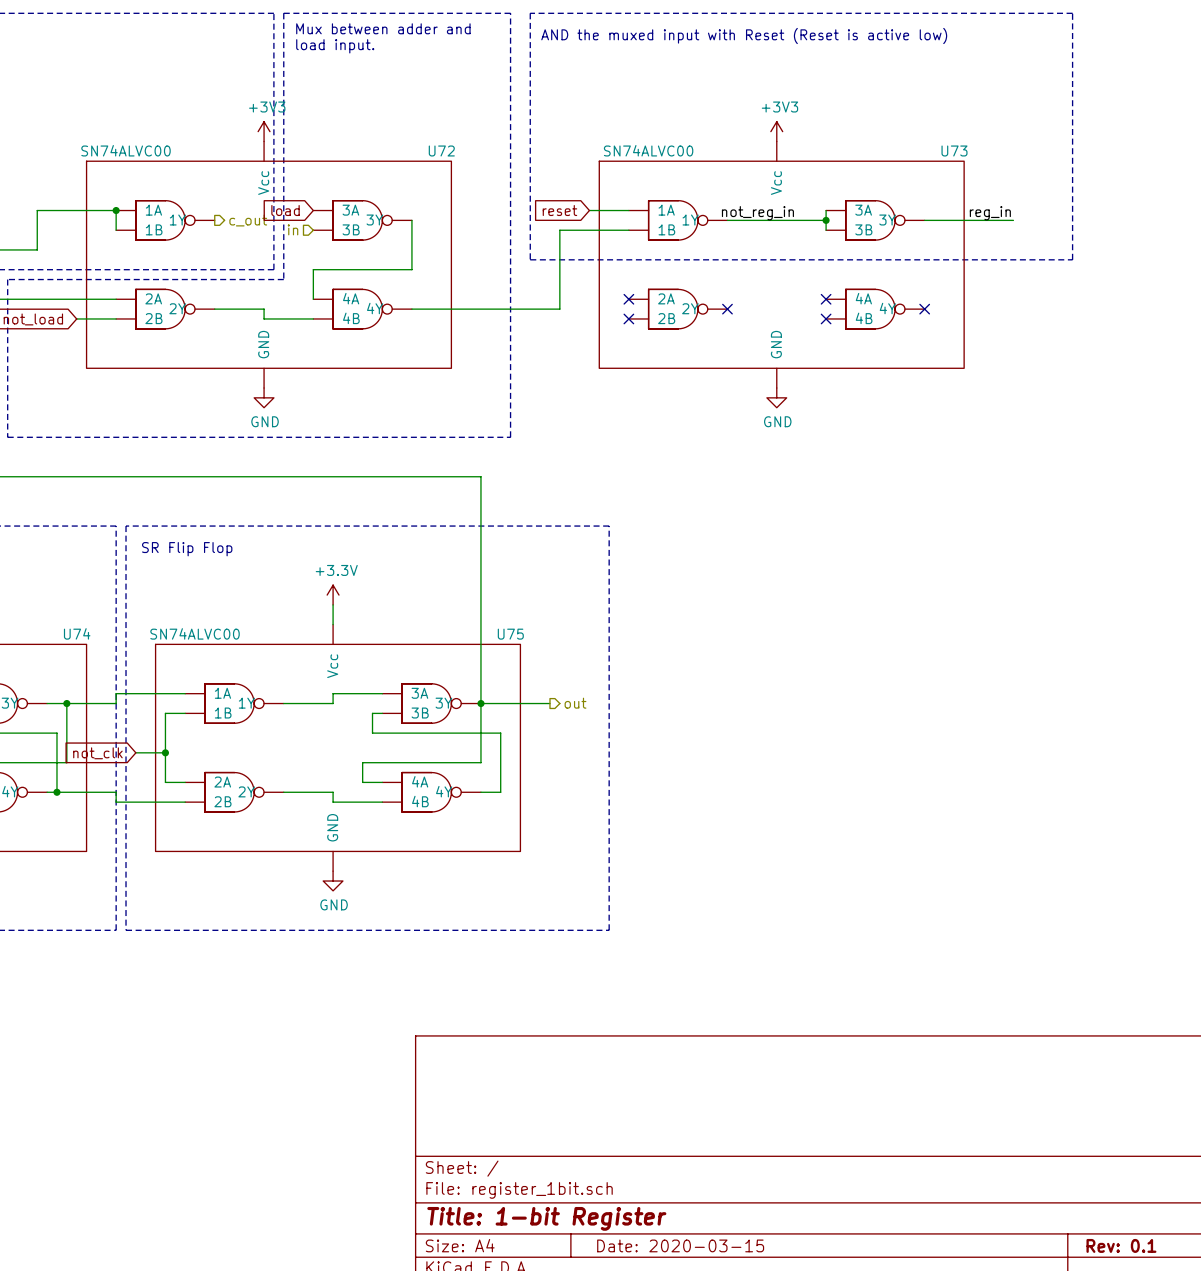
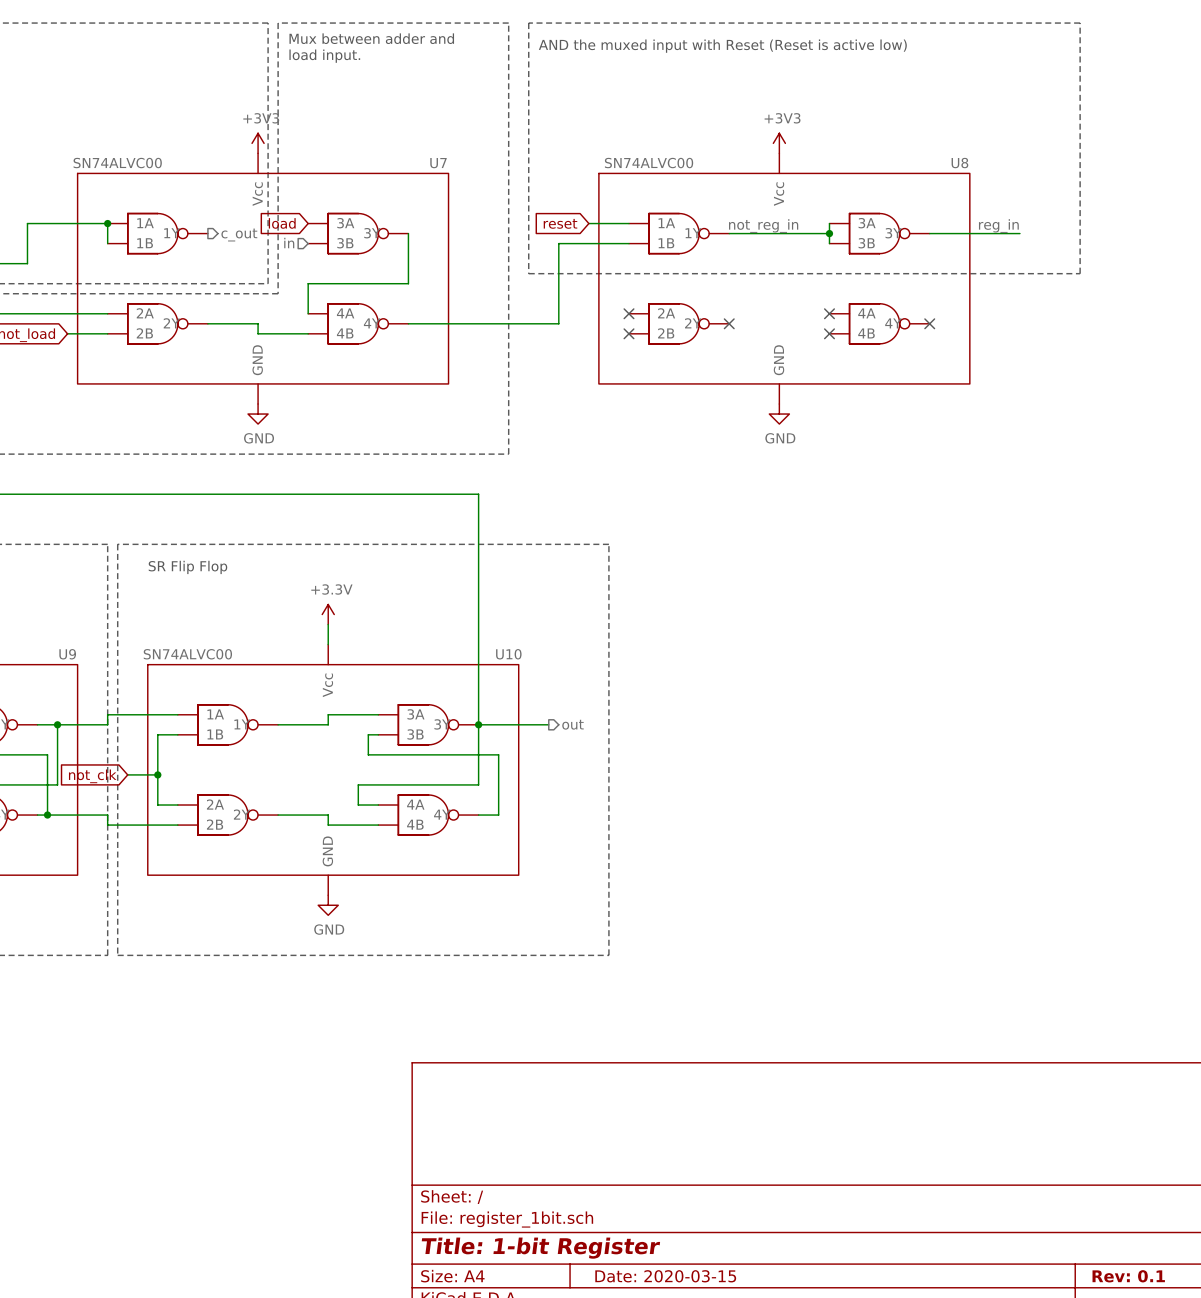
U72 name: U72 (441, 150) -> U7 (438, 163)
U73 name: U73 (954, 150) -> U8 (959, 163)
U74 name: U74 (77, 633) -> U9 (67, 654)
U75 name: U75 (510, 634) -> U10 (508, 654)

